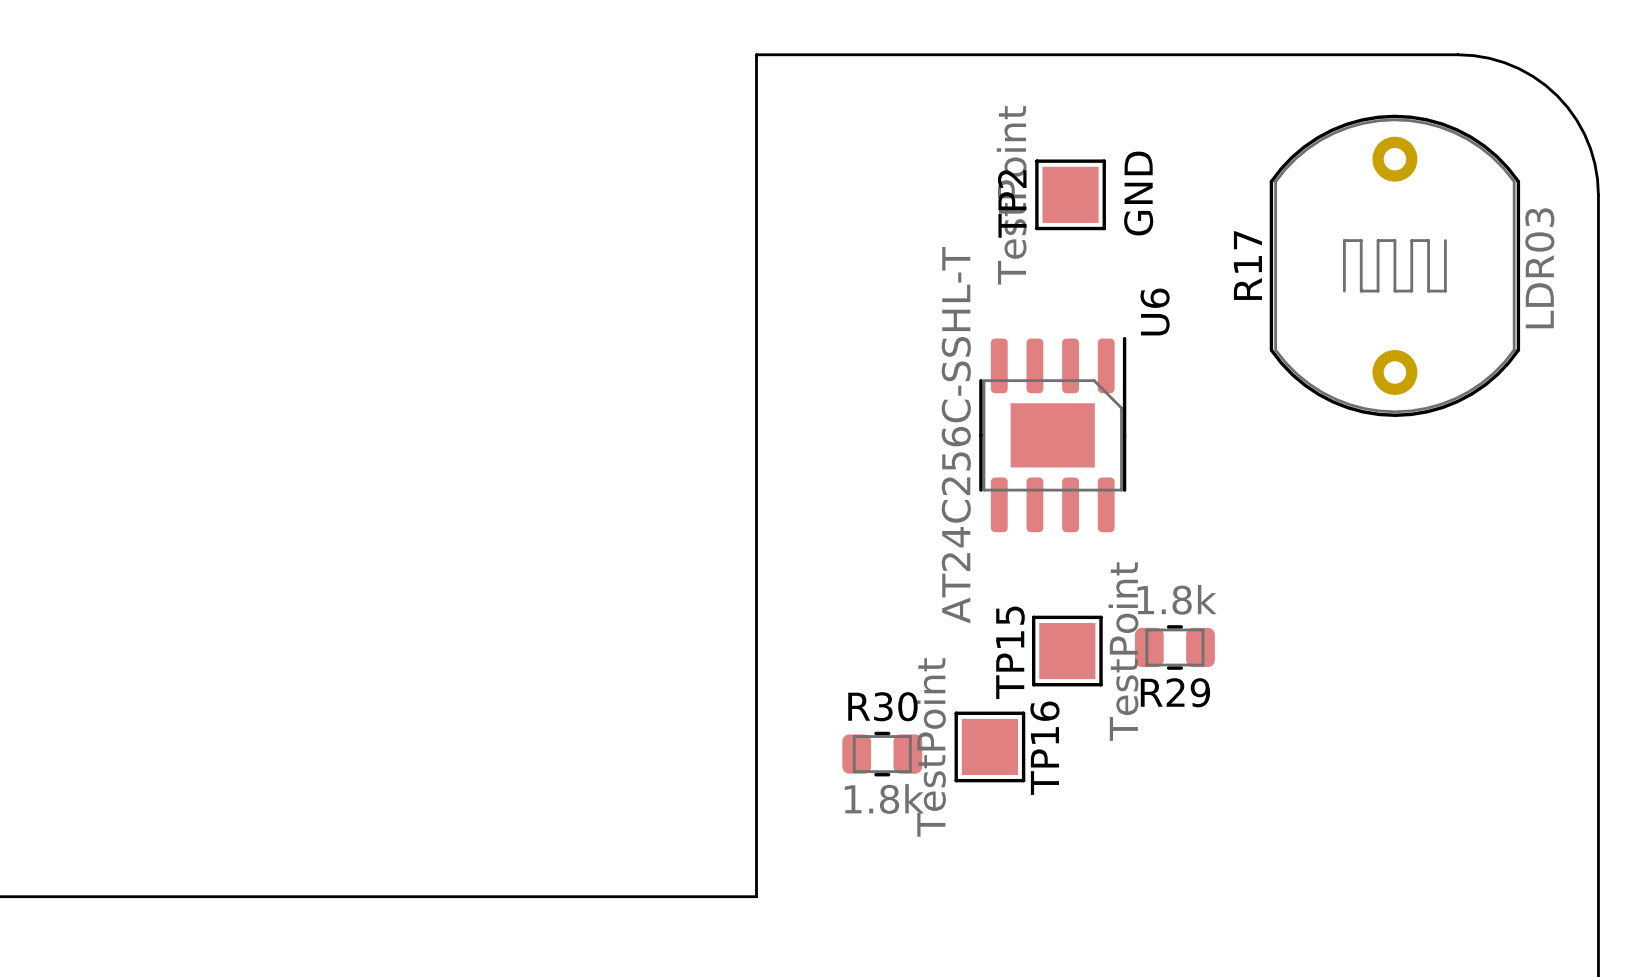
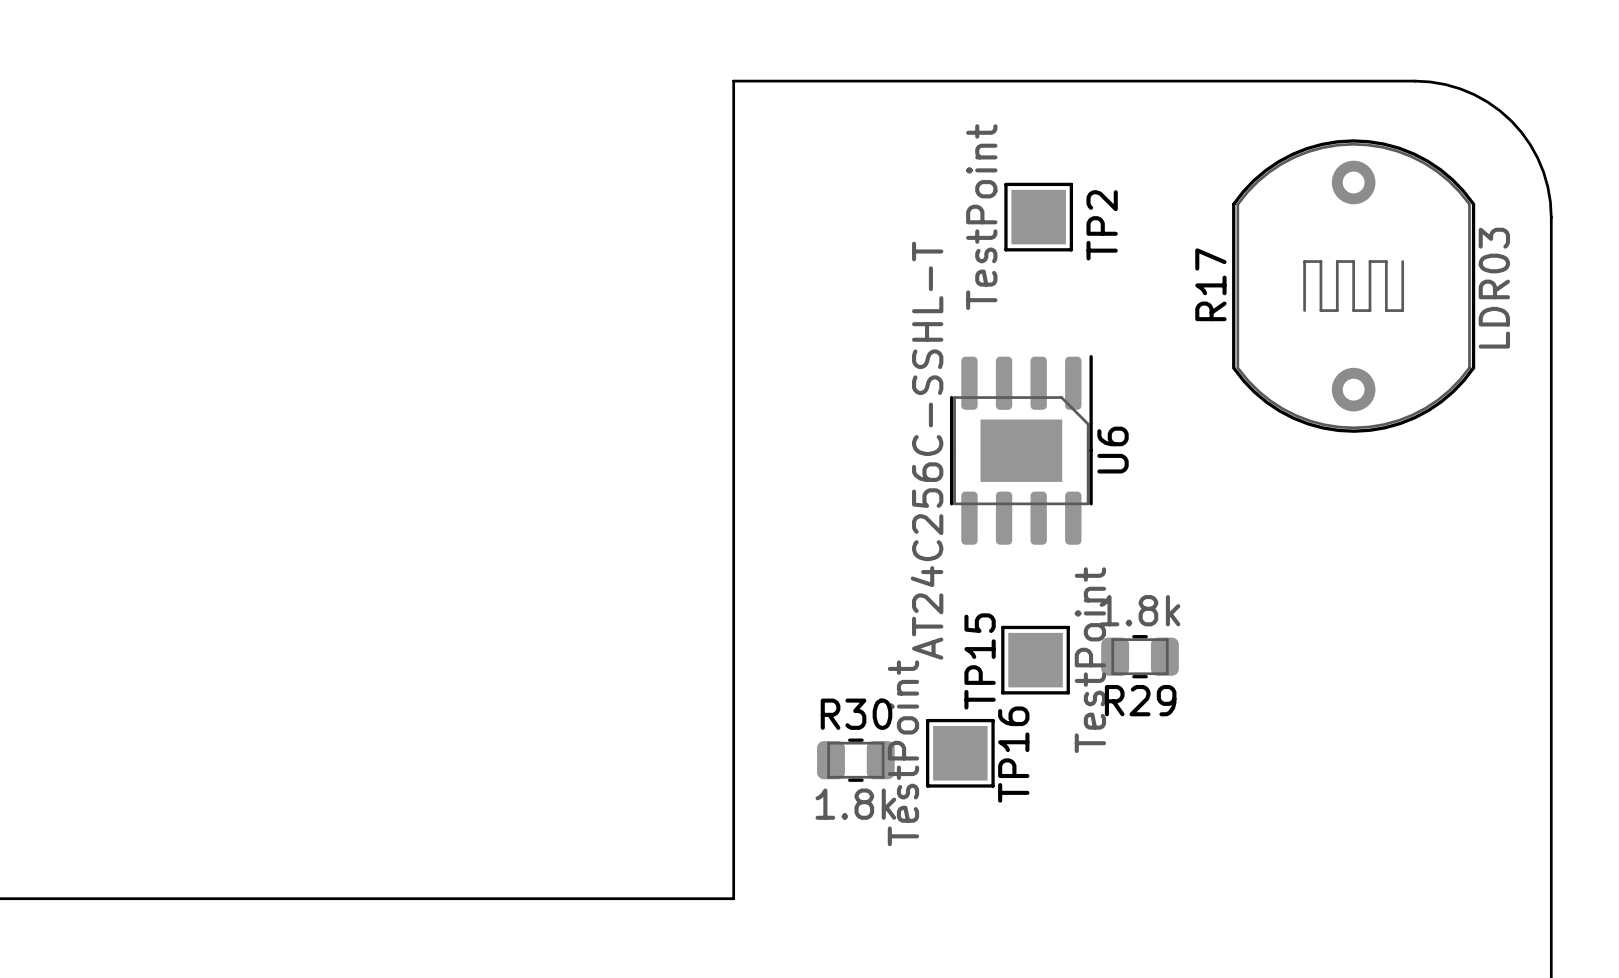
text: GND (1138, 193) -> none
TP2 name position: TP2 (1012, 203) -> TP2 (1102, 225)
U6 name position: U6 (1155, 311) -> U6 (1113, 450)

